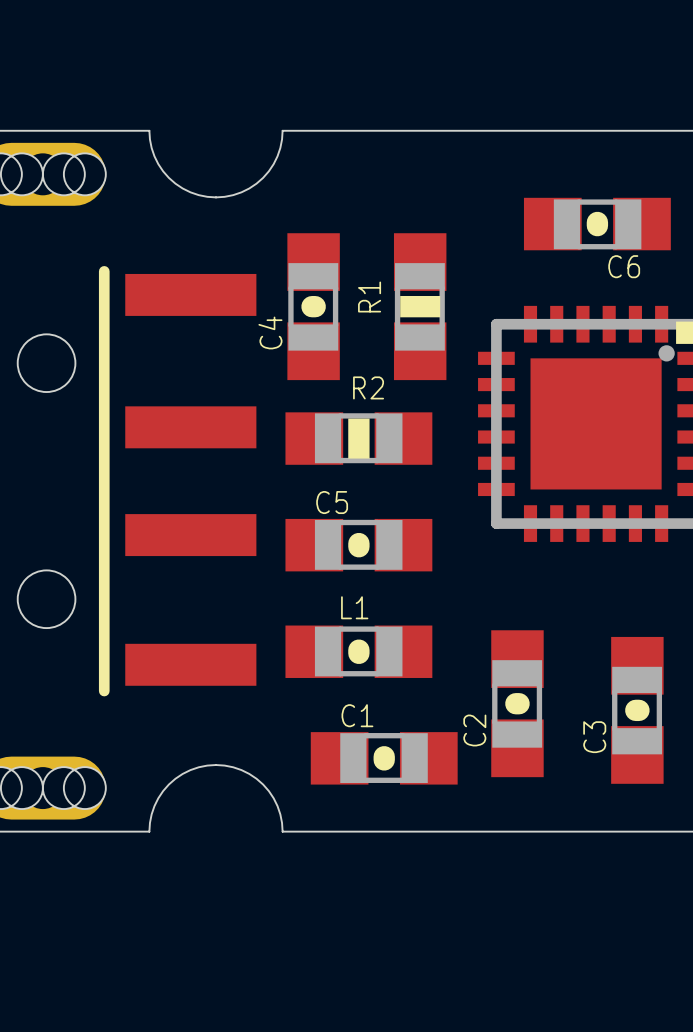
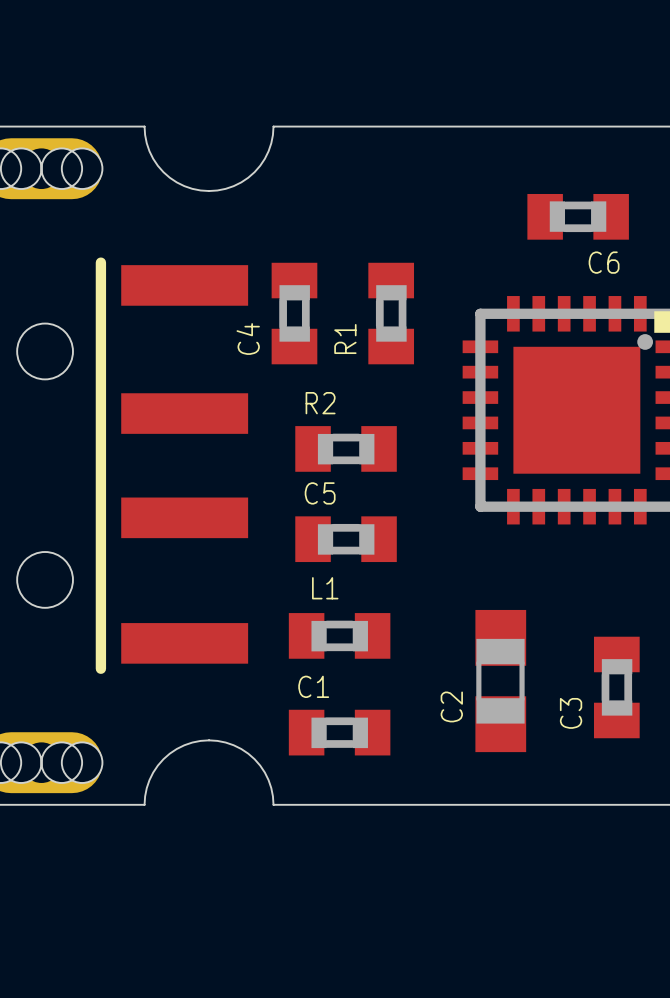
C6 footprint: [523, 197, 671, 251] -> [527, 193, 629, 240]
C4 footprint: [287, 233, 340, 381] -> [271, 262, 318, 365]
R1 footprint: [393, 233, 447, 381] -> [368, 262, 415, 365]
R2 footprint: [285, 412, 433, 465] -> [295, 426, 397, 472]
C5 footprint: [285, 518, 433, 572] -> [295, 516, 397, 563]
L1 footprint: [285, 625, 433, 678] -> [288, 613, 391, 659]
C2 footprint: [491, 630, 544, 778] -> [475, 609, 527, 753]
C3 footprint: [611, 636, 664, 784] -> [593, 636, 640, 739]
C1 footprint: [310, 732, 458, 785] -> [288, 709, 391, 756]

